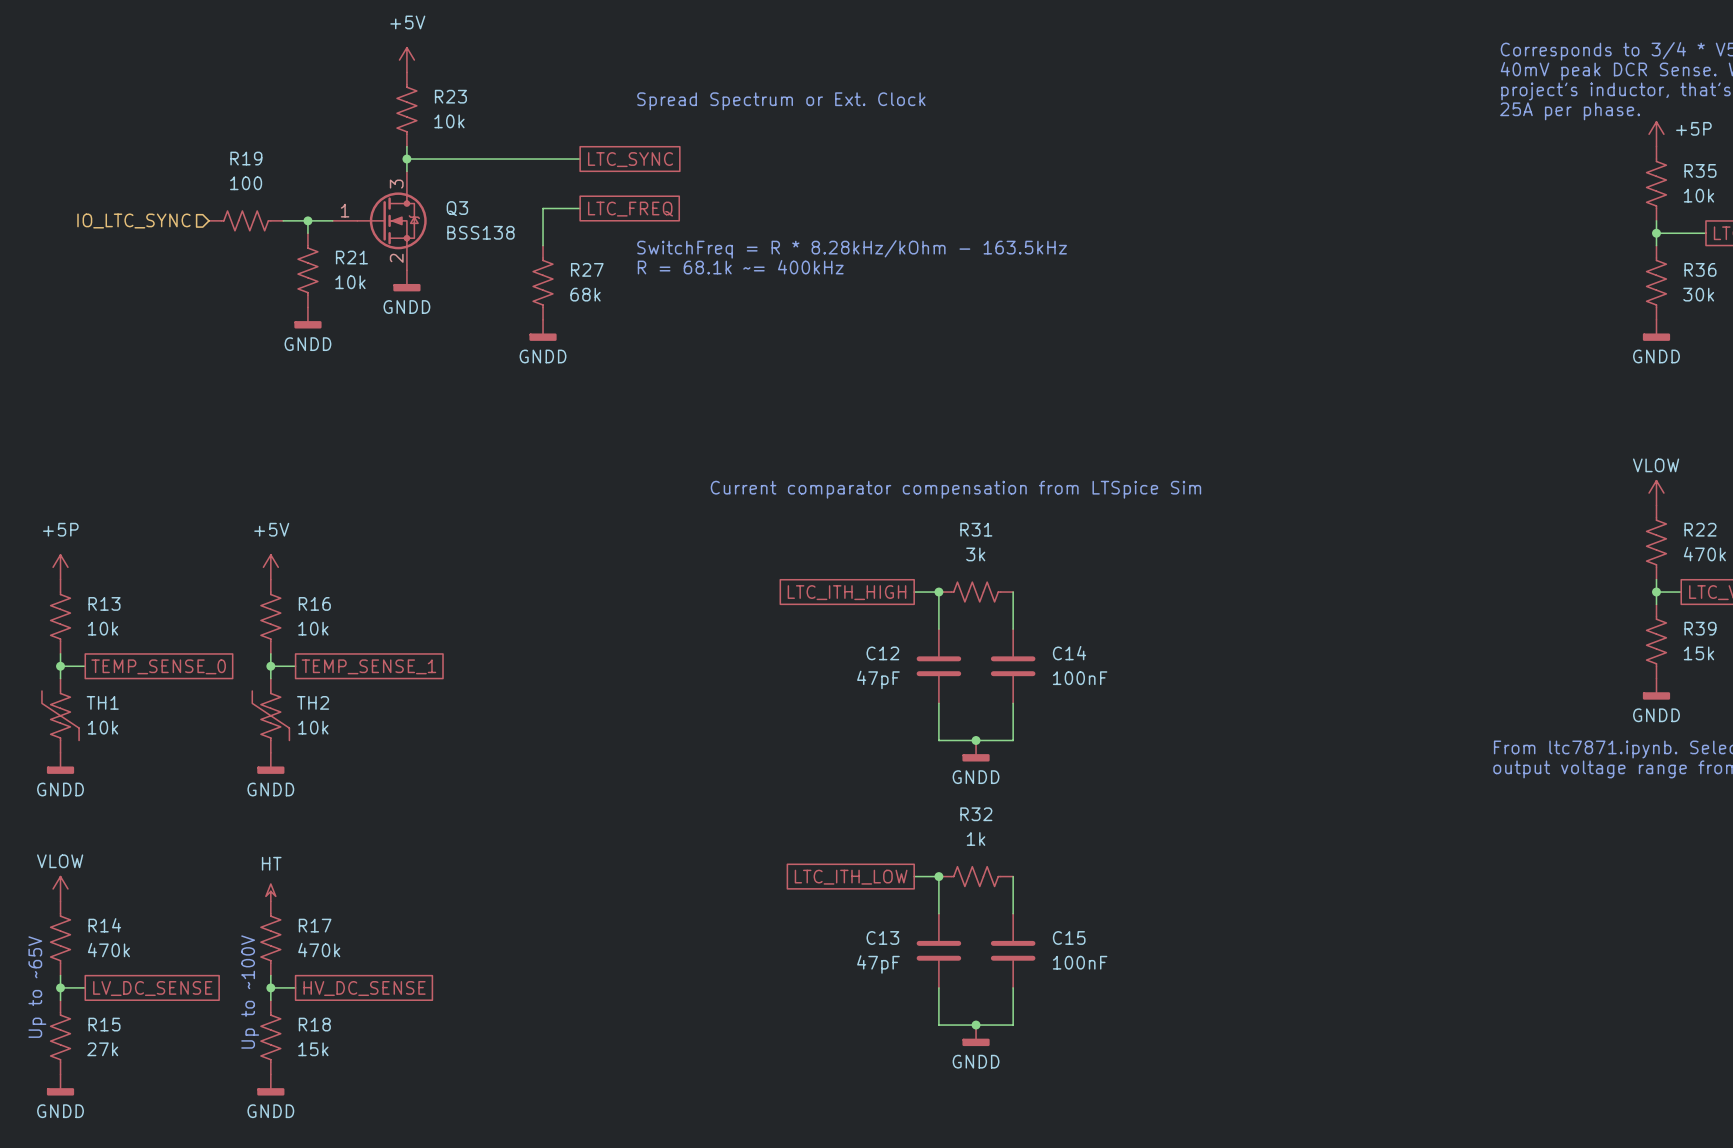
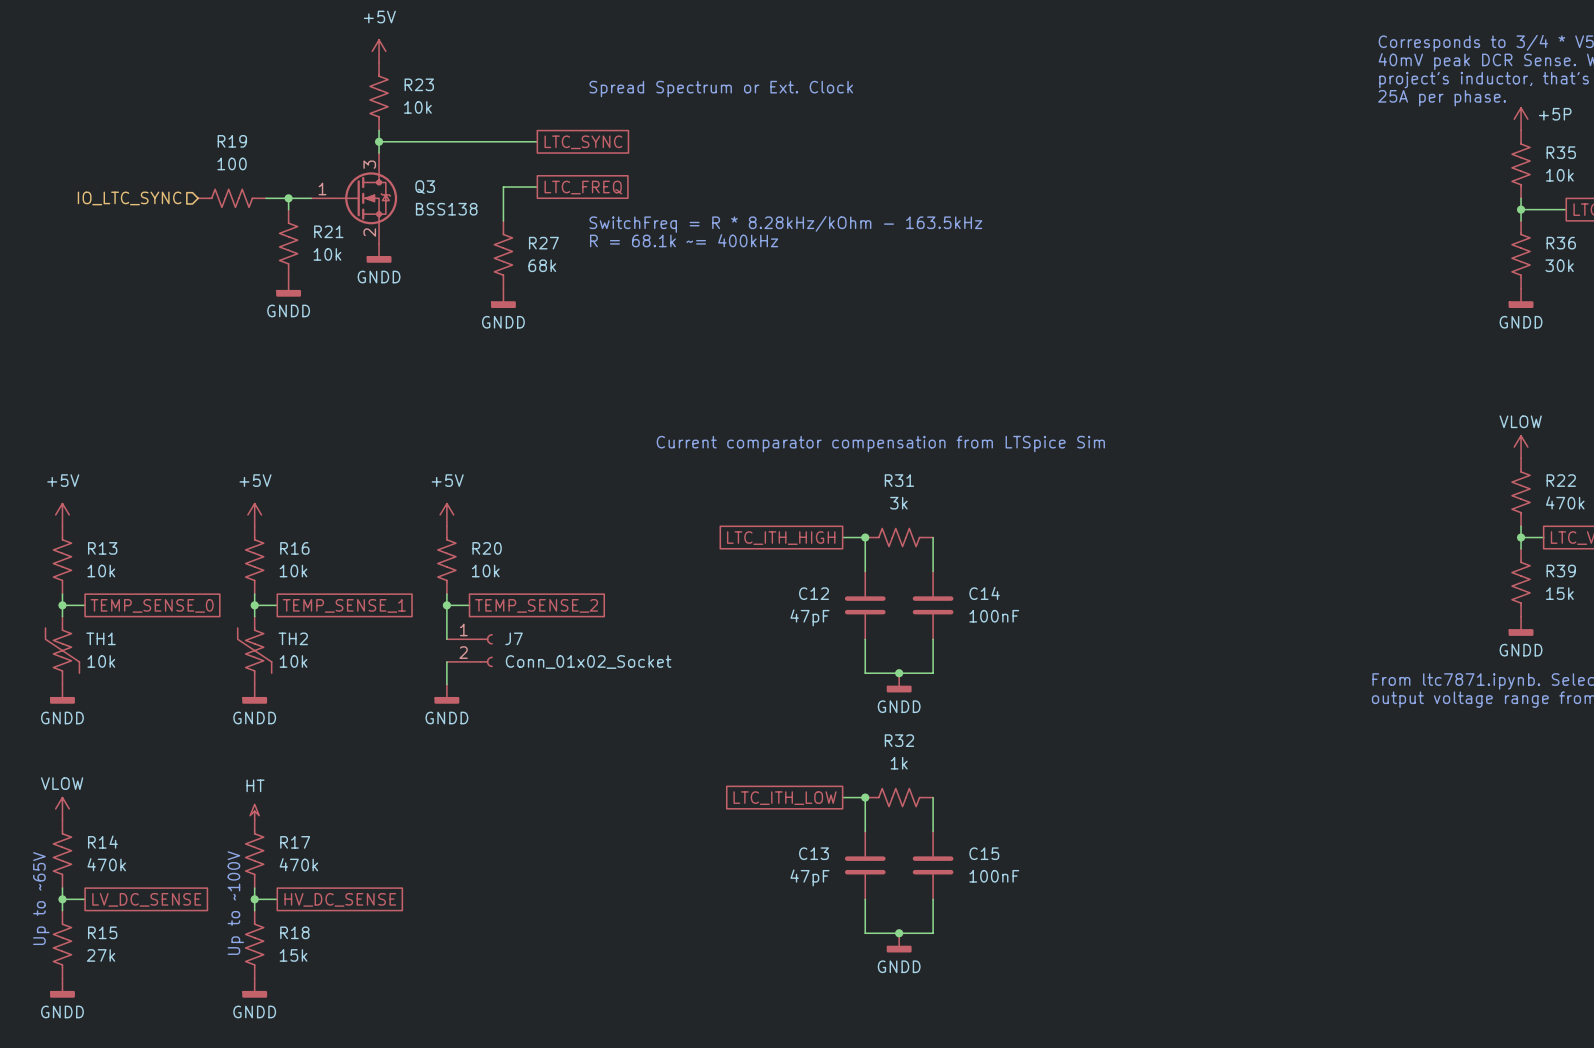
power symbol: +5P (60, 567) -> +5V (62, 514)
power symbol: none -> +5V (446, 514)
R20: none -> 10k (446, 560)
wire: none -> (446, 594) (446, 639)
wire: none -> (446, 605) (469, 605)
junction: none -> (446, 605)
global label: none -> TEMP_SENSE_2 (536, 605)
J7: none -> Conn_01x02_Socket (469, 650)
wire: none -> (446, 661) (446, 684)
power symbol: none -> GNDD (446, 694)

